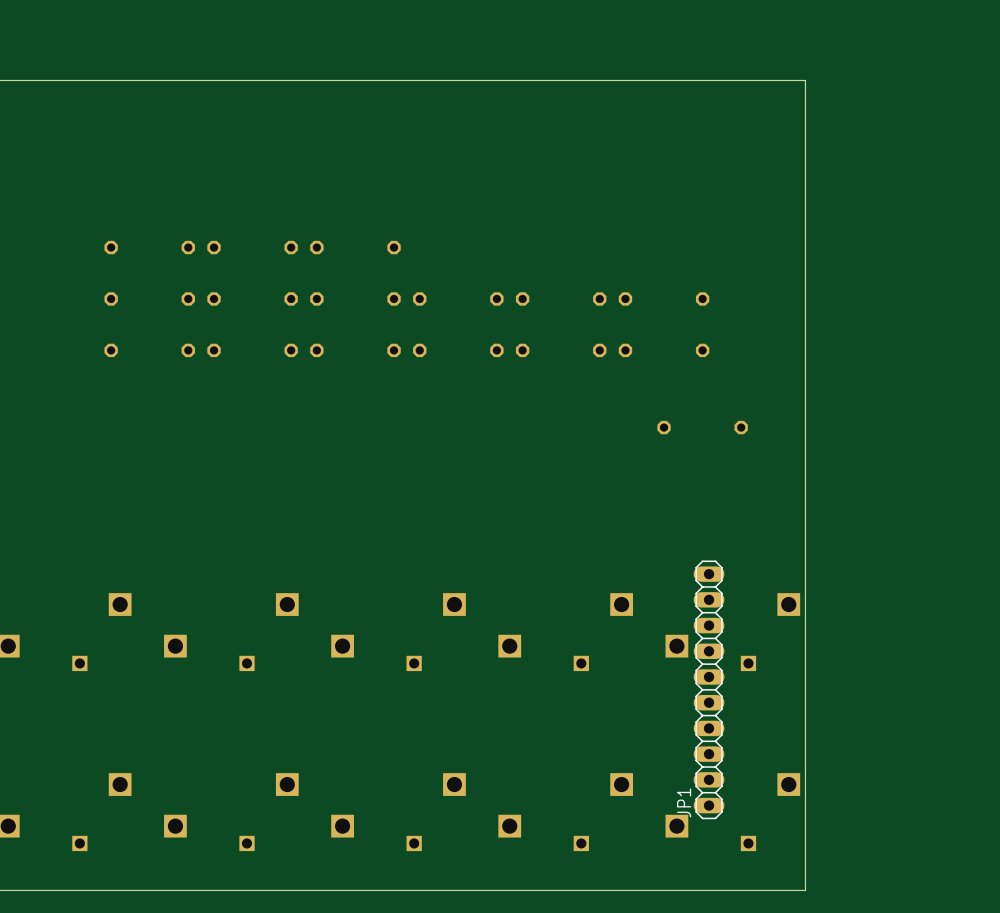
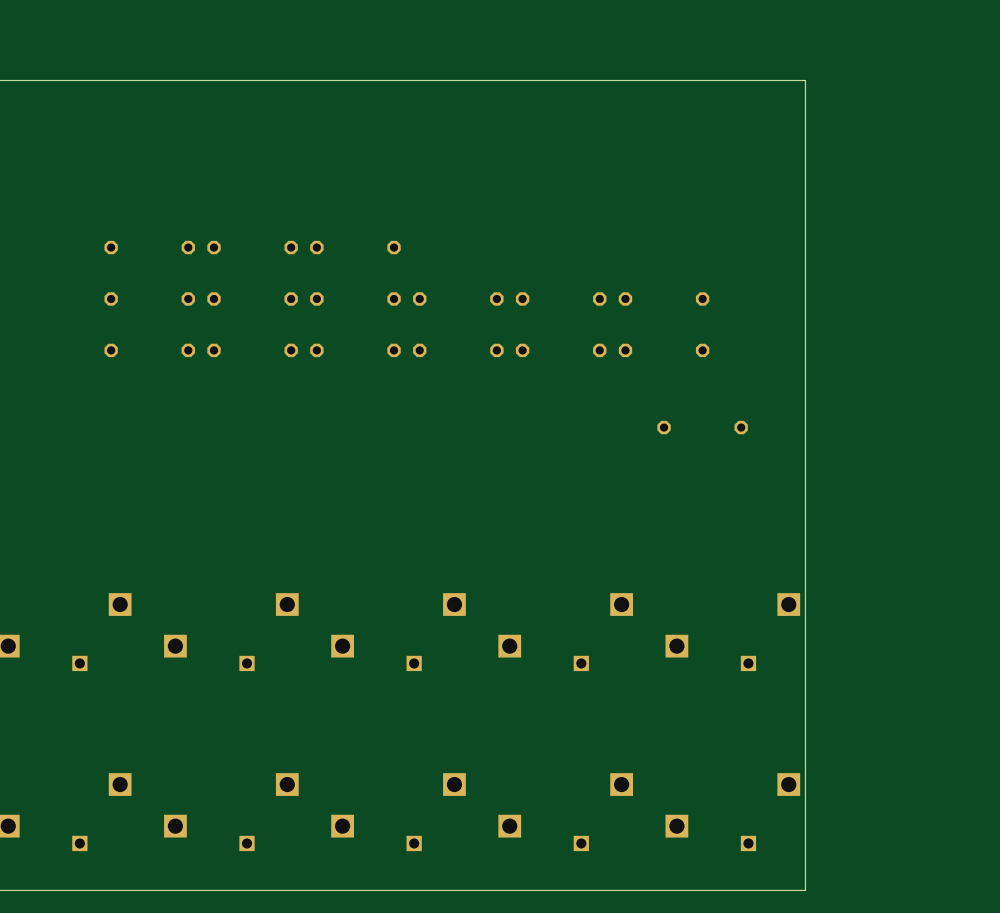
JP1: (709, 689) -> none

